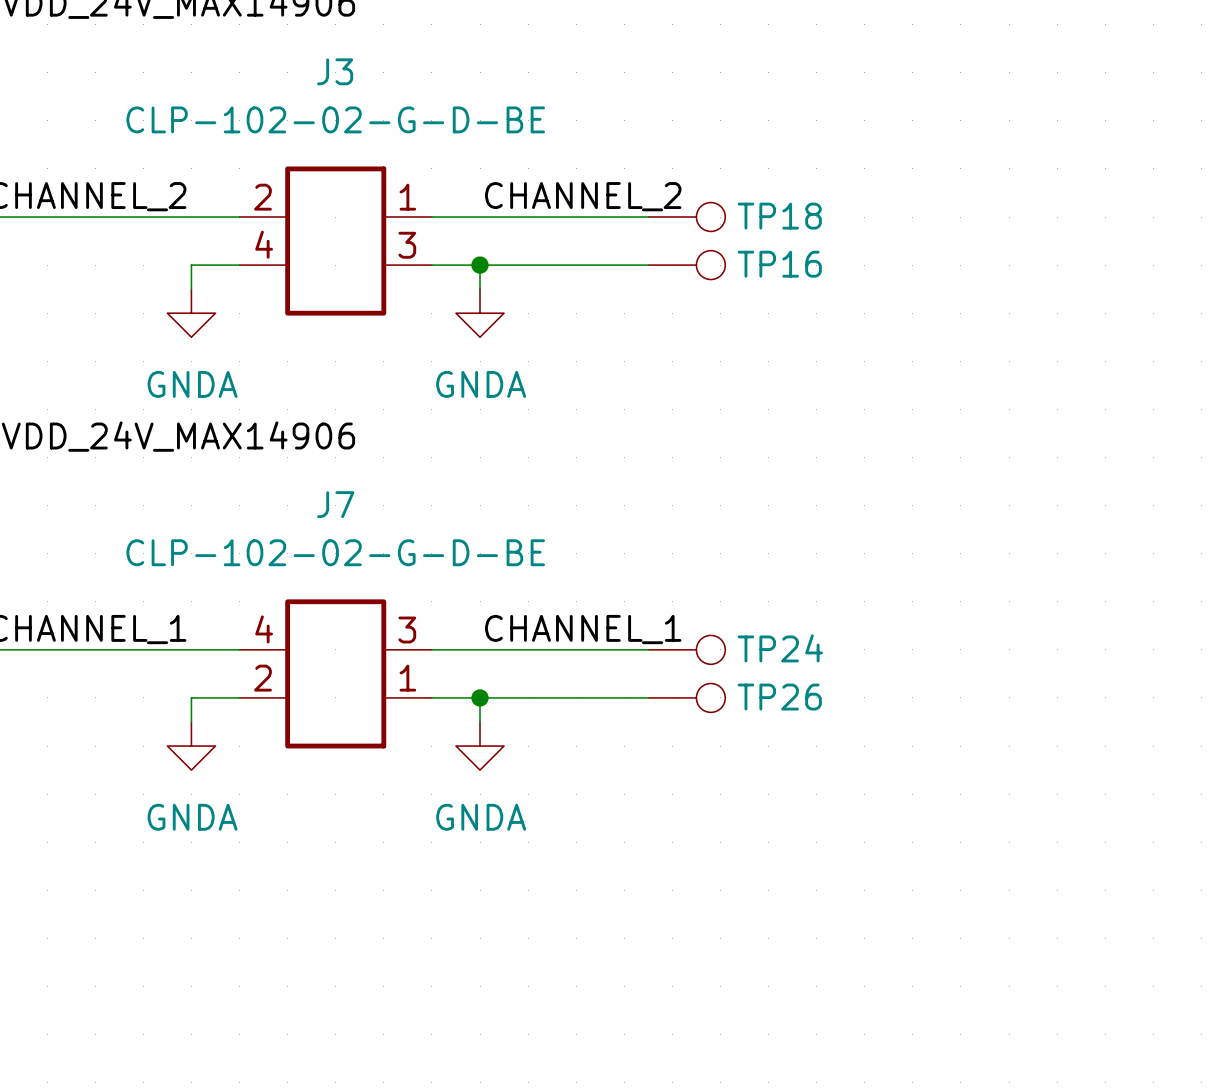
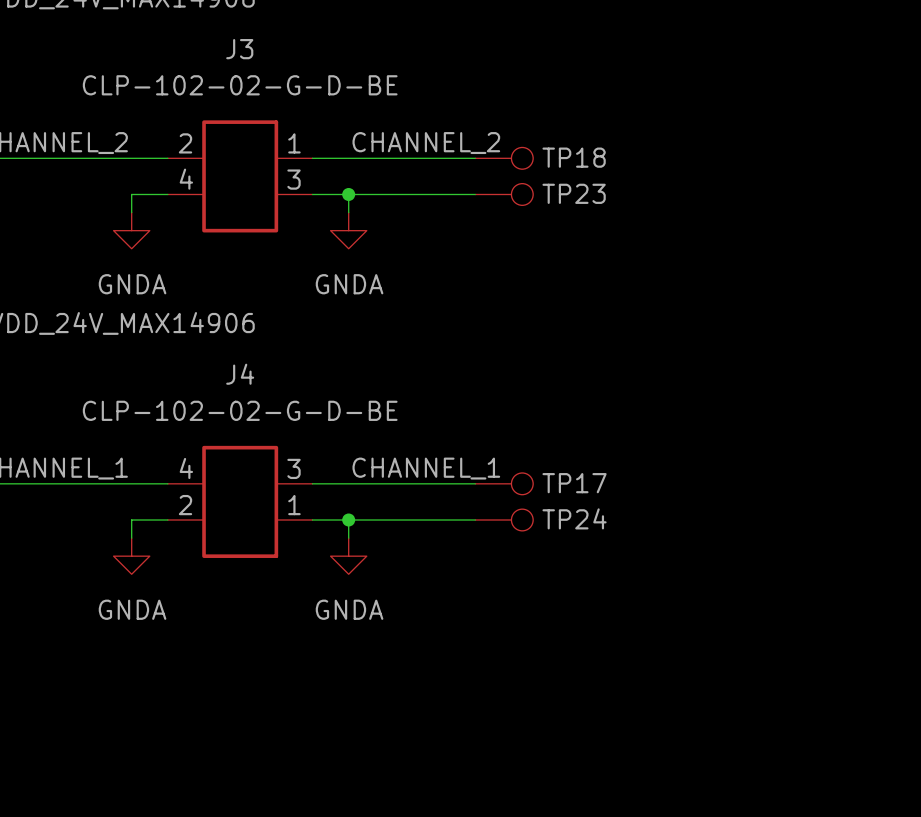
TP16 name: TP16 (779, 264) -> TP23 (574, 193)
J7 name: J7 (335, 504) -> J4 (240, 374)
TP24 name: TP24 (780, 648) -> TP17 (574, 483)
TP26 name: TP26 (779, 697) -> TP24 (574, 518)

